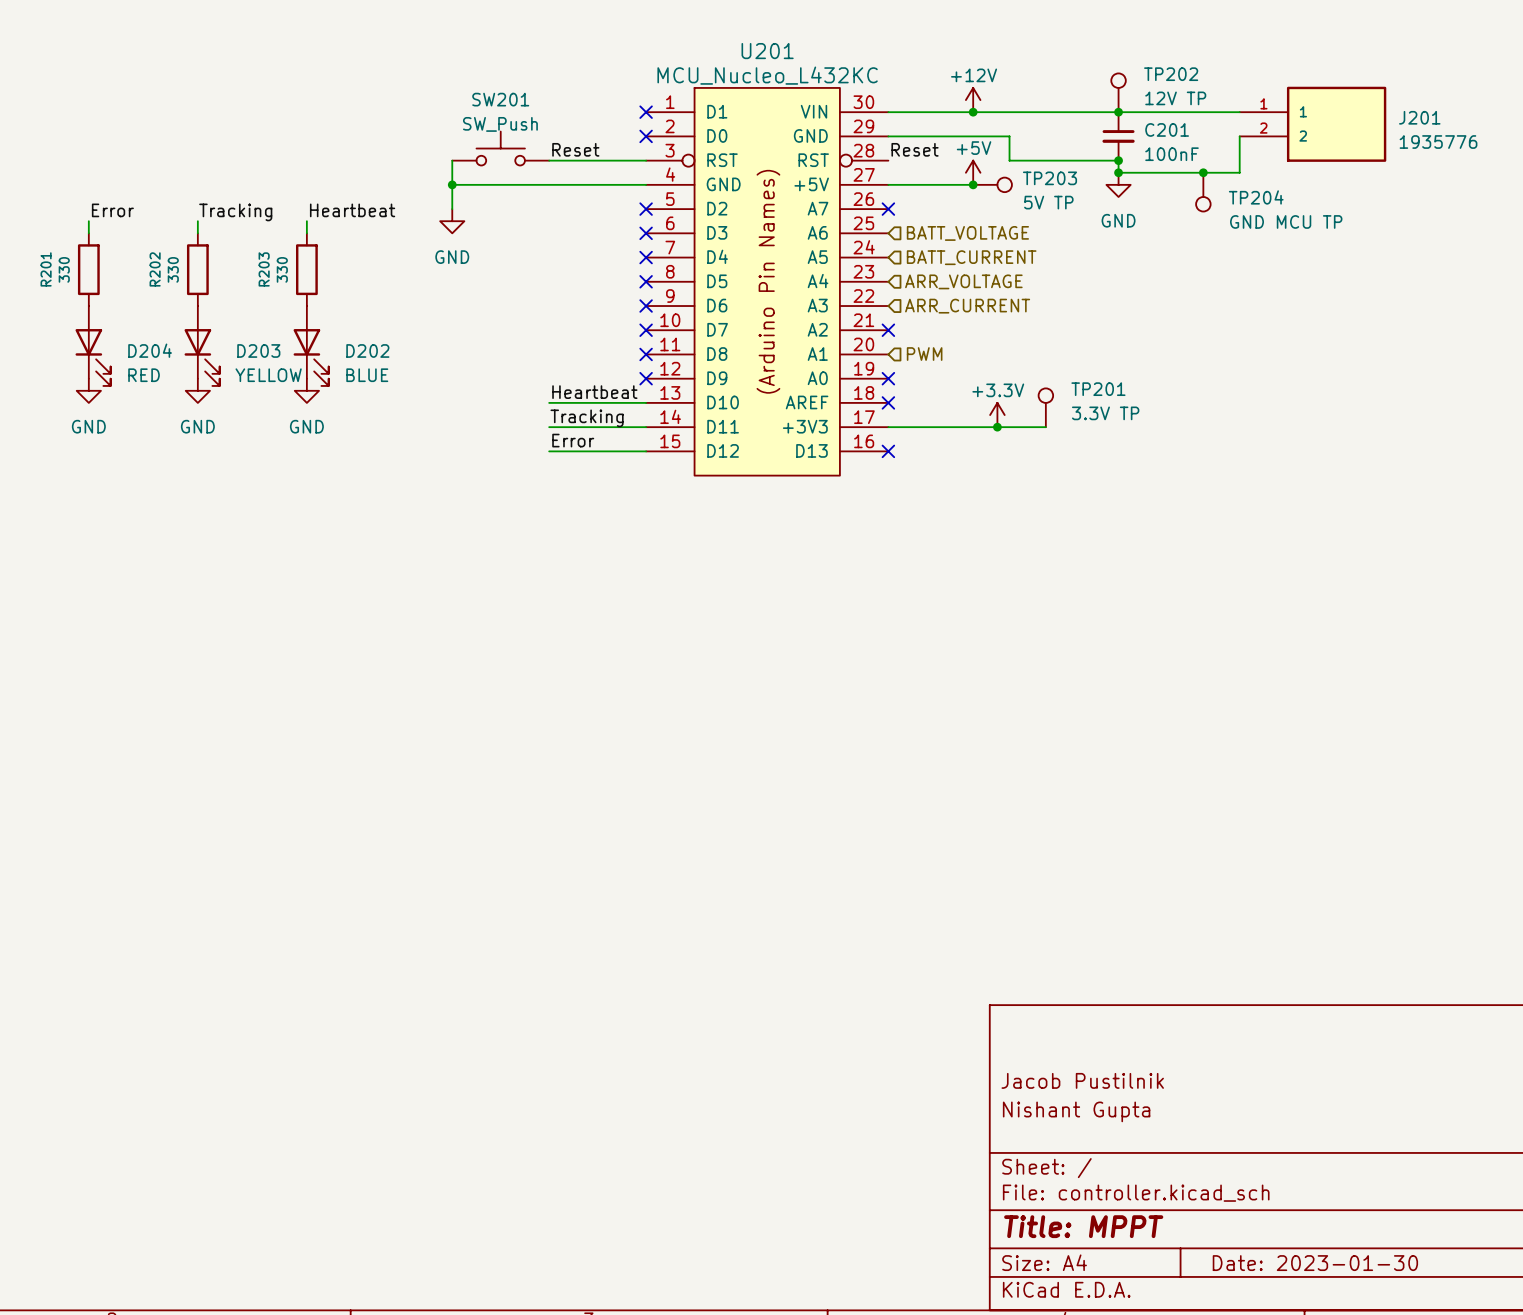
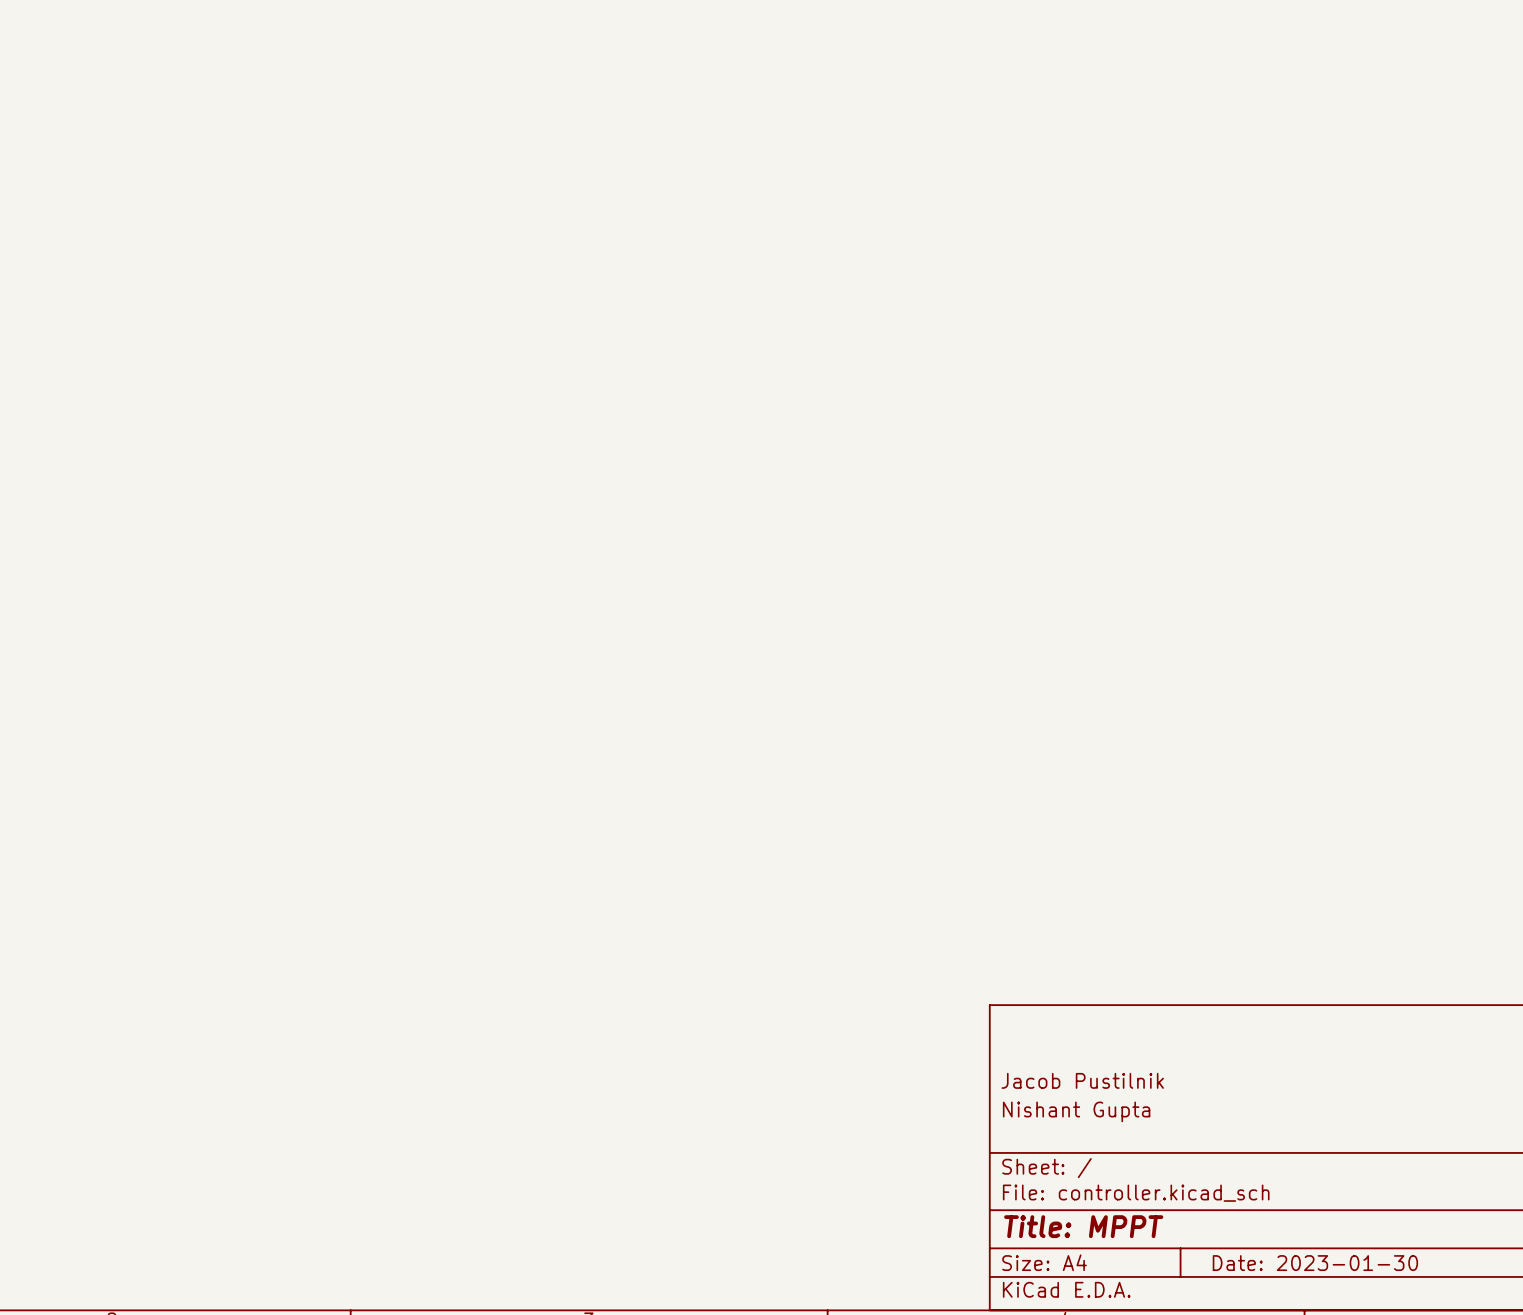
TP202: 12V TP (1118, 92) -> none
power symbol: +12V (973, 100) -> none
no-connect mark: (646, 112) -> none
wire: (888, 112) (1239, 112) -> none
junction: (973, 112) -> none
junction: (1118, 112) -> none
J201: 1935776 (1312, 124) -> none
no-connect mark: (646, 136) -> none
wire: (888, 136) (1009, 136) (1009, 160) (1118, 160) (1118, 172) (1239, 172) (1239, 136) -> none
C201: 100nF (1118, 136) -> none
SW201: SW_Push (500, 148) -> none
label: Reset (575, 149) -> none
label: Reset (915, 149) -> none
wire: (452, 160) (452, 209) -> none
wire: (549, 160) (646, 160) -> none
junction: (1118, 160) -> none
power symbol: +5V (973, 172) -> none
junction: (1118, 172) -> none
junction: (1203, 172) -> none
wire: (452, 184) (646, 184) -> none
junction: (452, 184) -> none
wire: (888, 184) (973, 184) -> none
junction: (973, 184) -> none
TP203: 5V TP (992, 184) -> none
power symbol: GND (1118, 184) -> none
TP204: GND MCU TP (1203, 192) -> none
no-connect mark: (646, 209) -> none
no-connect mark: (888, 209) -> none
label: Error (112, 210) -> none
label: Heartbeat (352, 210) -> none
label: Tracking (235, 212) -> none
wire: (88, 221) (88, 233) -> none
wire: (197, 221) (197, 233) -> none
wire: (306, 221) (306, 233) -> none
power symbol: GND (452, 221) -> none
no-connect mark: (646, 233) -> none
hierarchical label: BATT_VOLTAGE (967, 233) -> none
no-connect mark: (646, 257) -> none
hierarchical label: BATT_CURRENT (971, 257) -> none
R201: 330 (88, 269) -> none
R202: 330 (197, 269) -> none
R203: 330 (306, 269) -> none
no-connect mark: (646, 281) -> none
U201: MCU_Nucleo_L432KC (767, 281) -> none
hierarchical label: ARR_VOLTAGE (963, 281) -> none
no-connect mark: (646, 306) -> none
hierarchical label: ARR_CURRENT (967, 306) -> none
no-connect mark: (646, 330) -> none
no-connect mark: (888, 330) -> none
D204: RED (93, 345) -> none
D203: YELLOW (202, 345) -> none
D202: BLUE (311, 345) -> none
no-connect mark: (646, 354) -> none
hierarchical label: PWM (924, 354) -> none
no-connect mark: (646, 378) -> none
no-connect mark: (888, 378) -> none
power symbol: GND (88, 390) -> none
power symbol: GND (197, 390) -> none
power symbol: GND (306, 390) -> none
label: Heartbeat (594, 392) -> none
wire: (549, 402) (646, 402) -> none
no-connect mark: (888, 402) -> none
TP201: 3.3V TP (1045, 407) -> none
power symbol: +3.3V (997, 415) -> none
label: Tracking (587, 418) -> none
wire: (549, 427) (646, 427) -> none
wire: (888, 427) (1045, 427) -> none
junction: (997, 427) -> none
label: Error (573, 440) -> none
wire: (549, 451) (646, 451) -> none
no-connect mark: (888, 451) -> none

